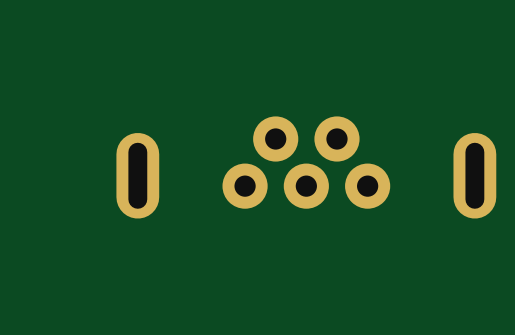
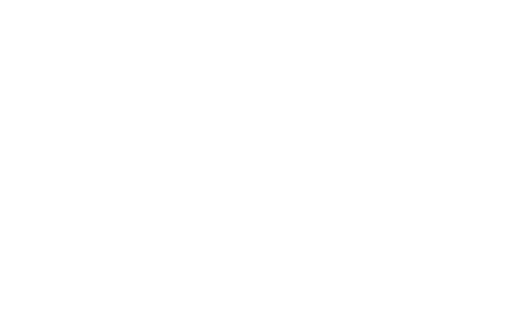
part: (306, 167) -> none

